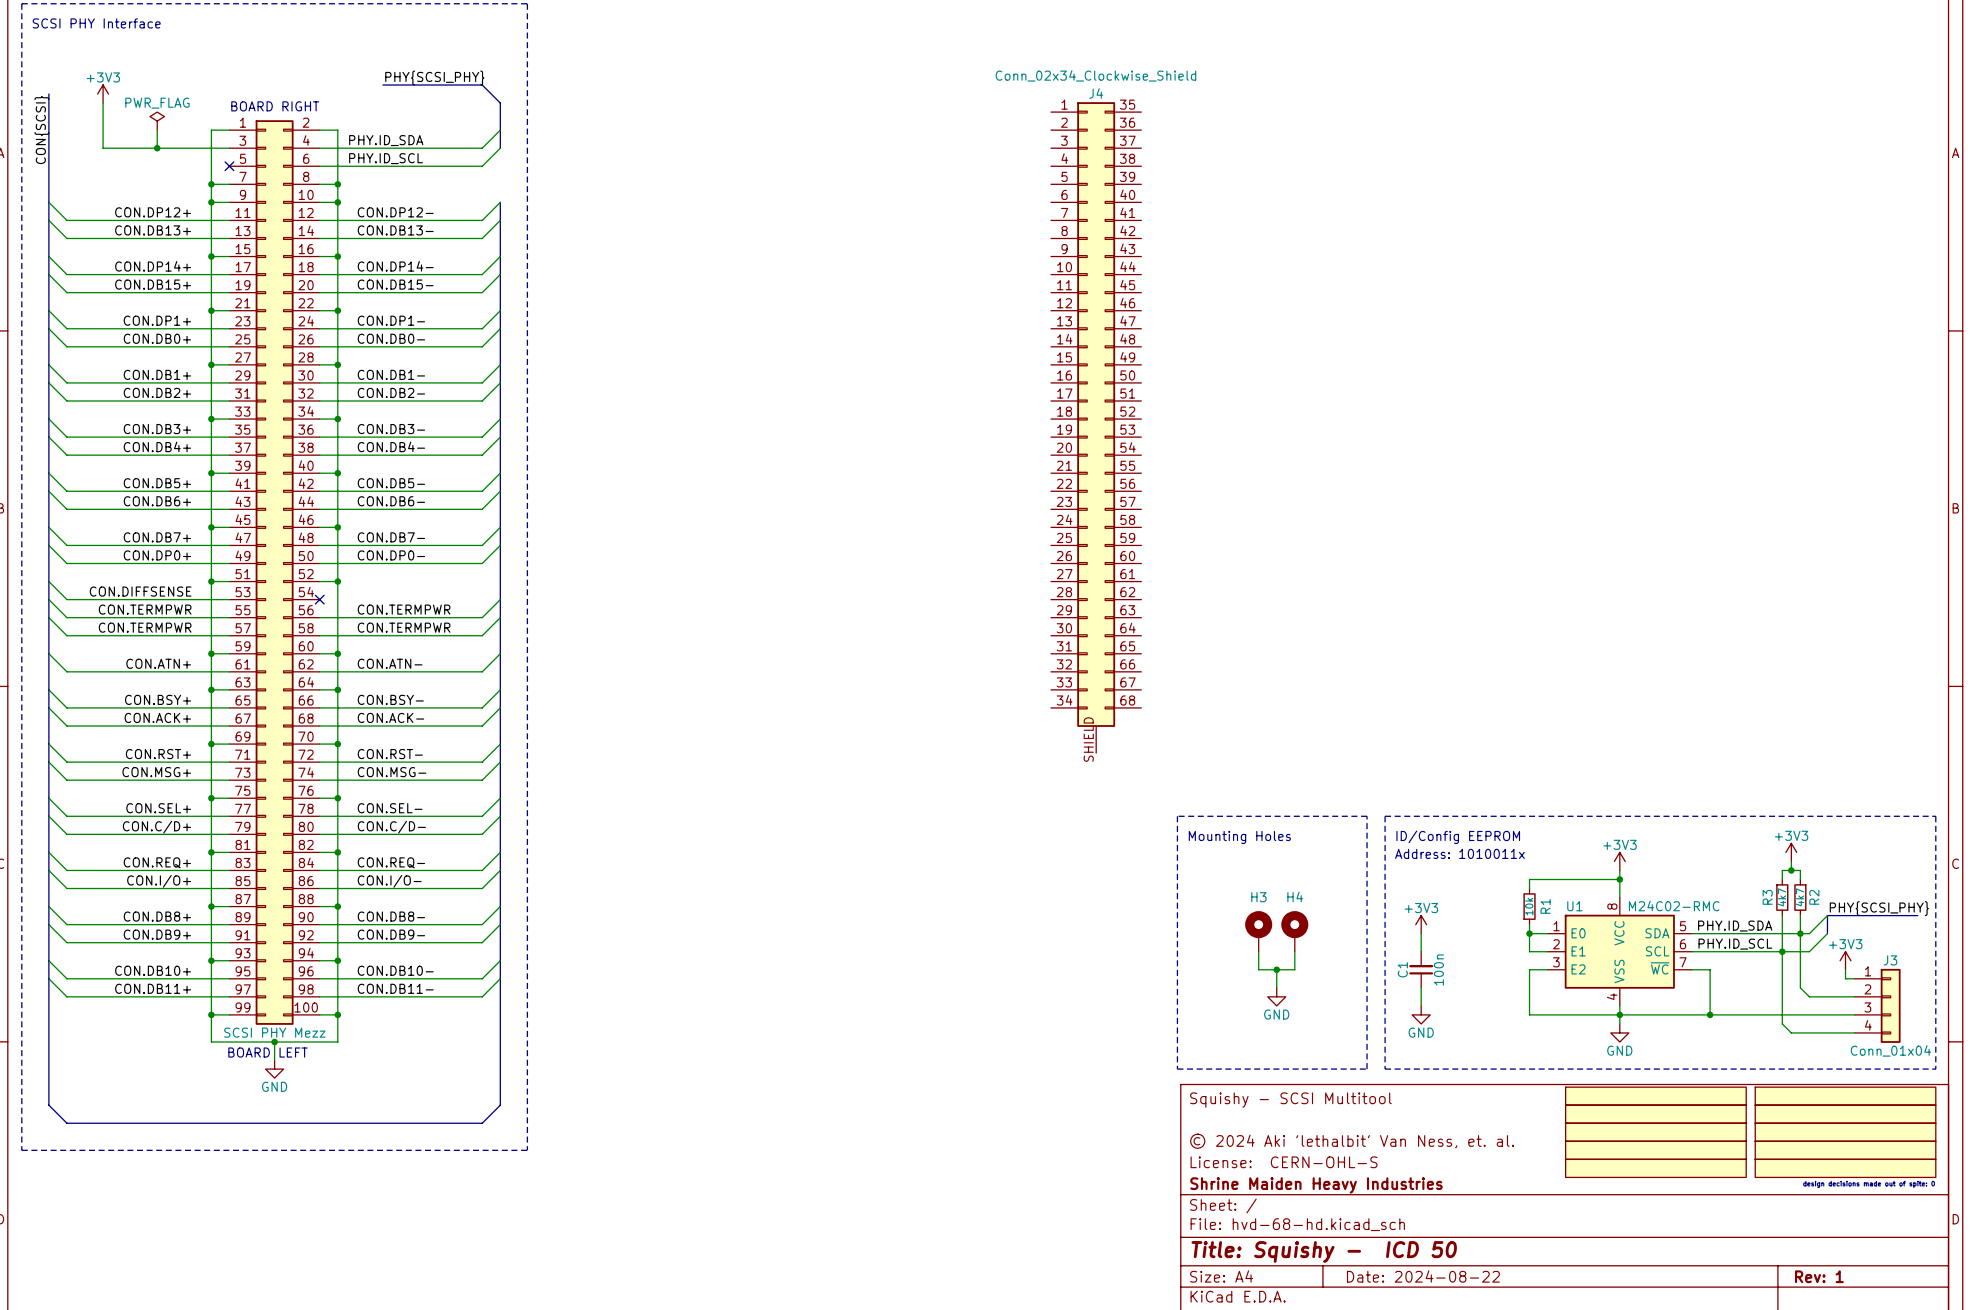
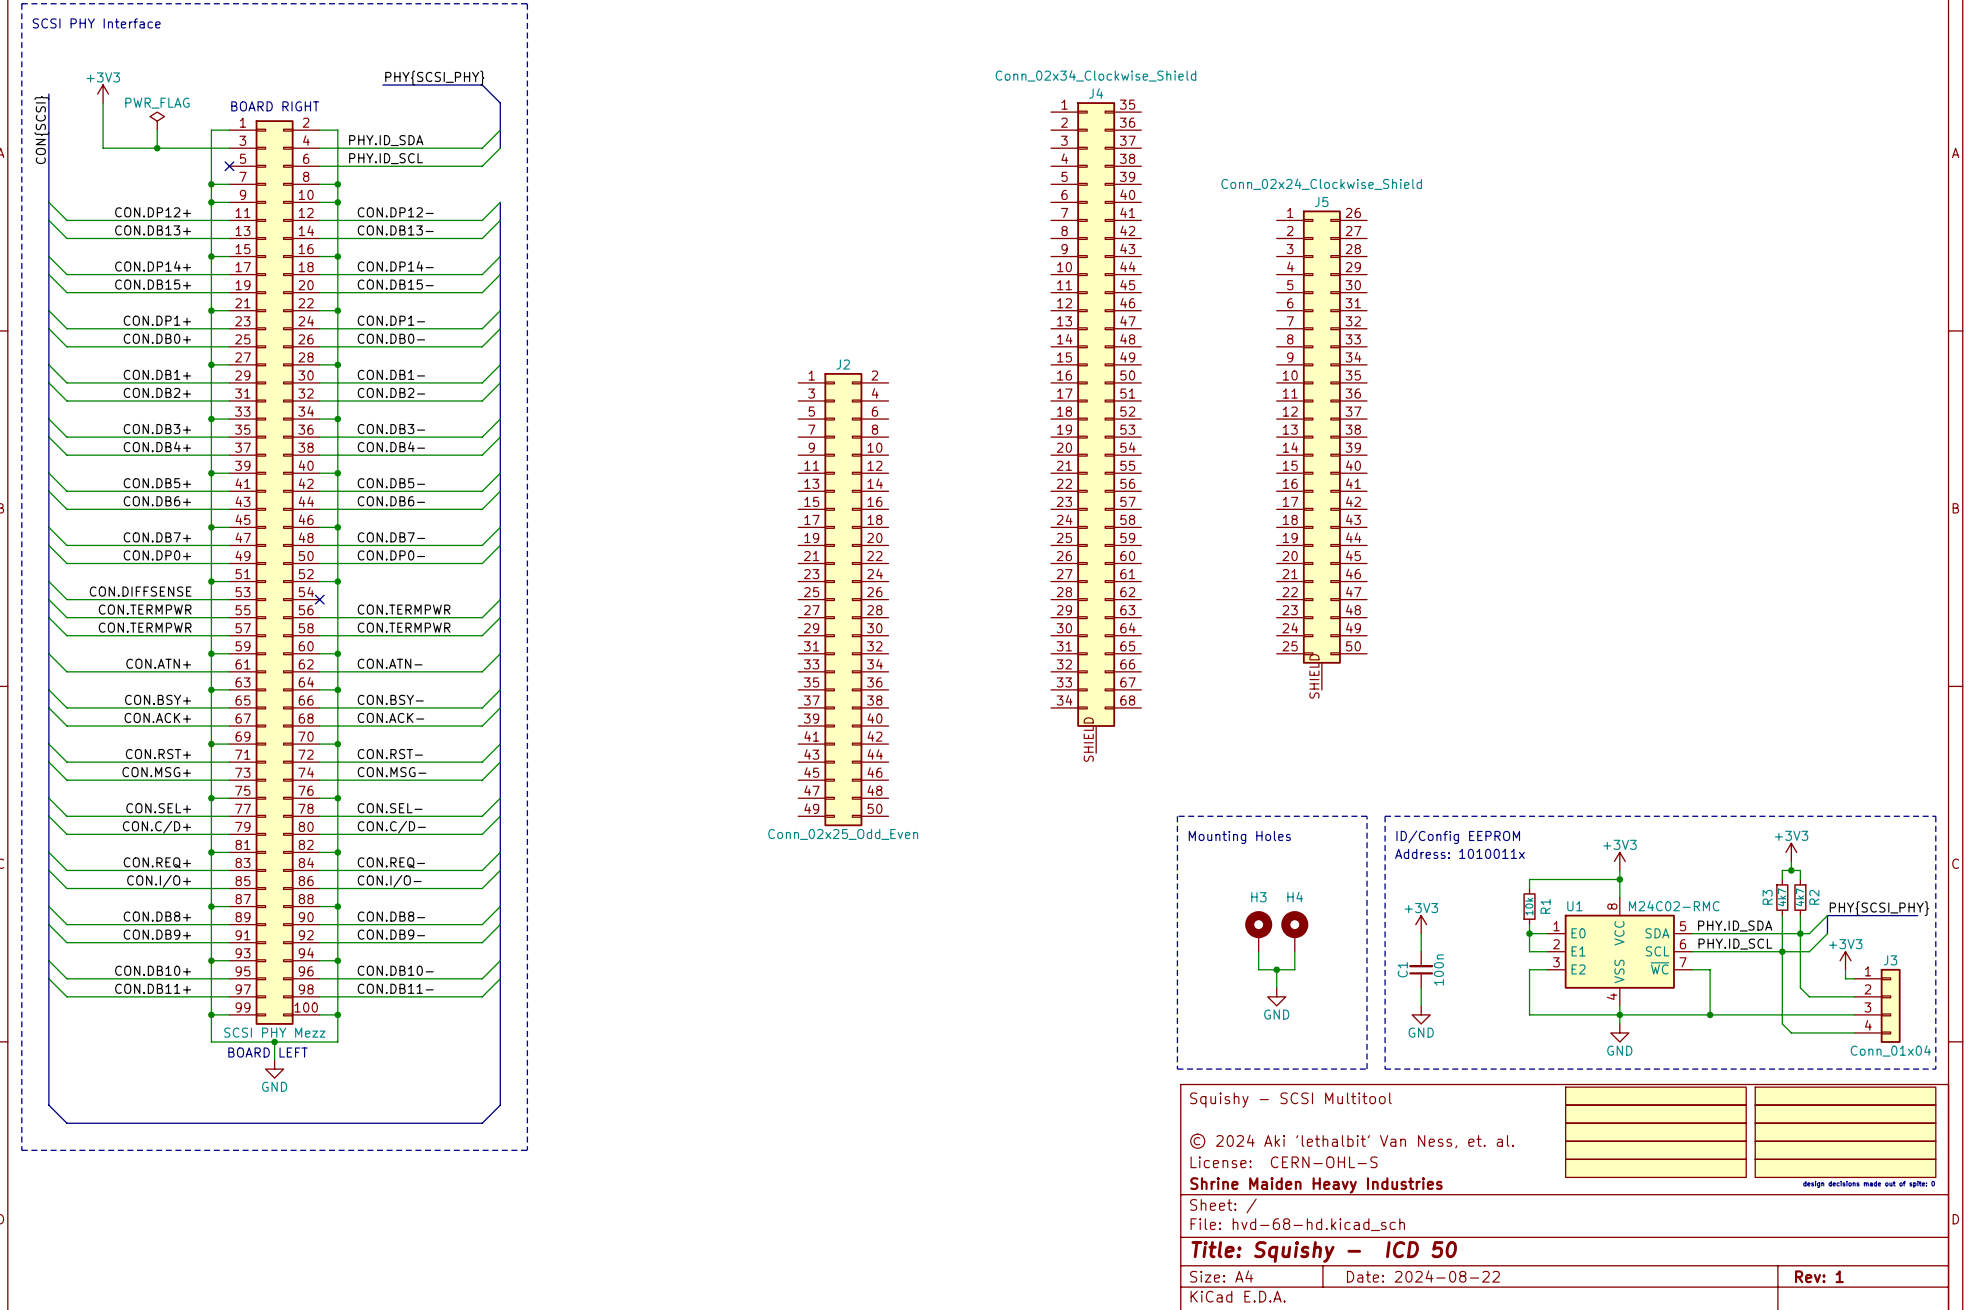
J5: none -> Conn_02x24_Clockwise_Shield (1321, 450)
J2: none -> Conn_02x25_Odd_Even (843, 599)

